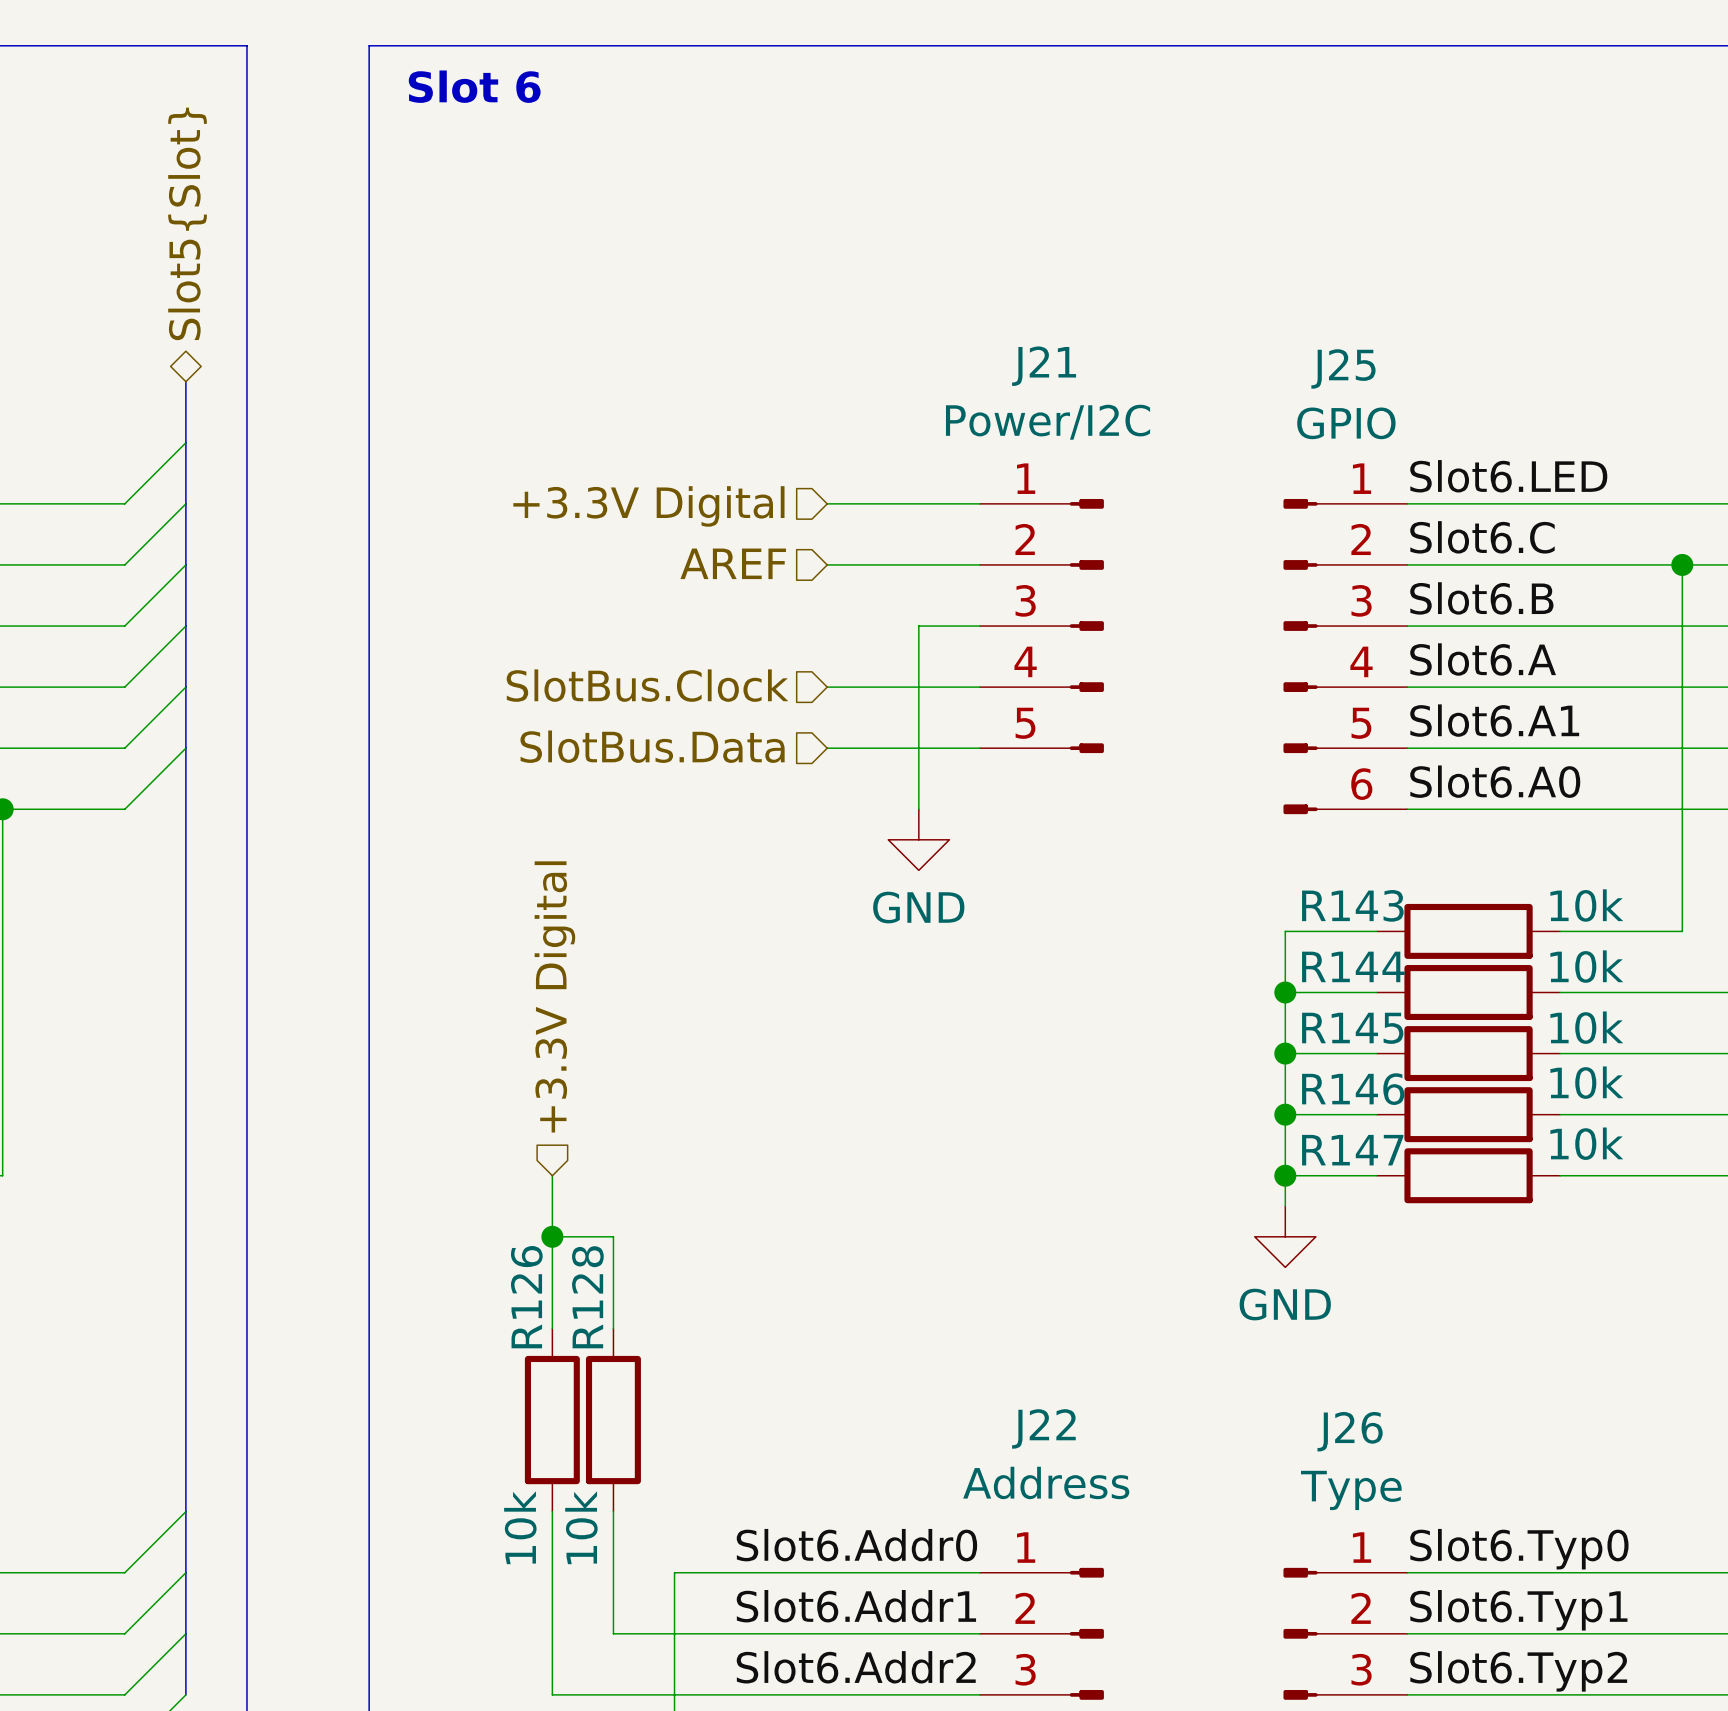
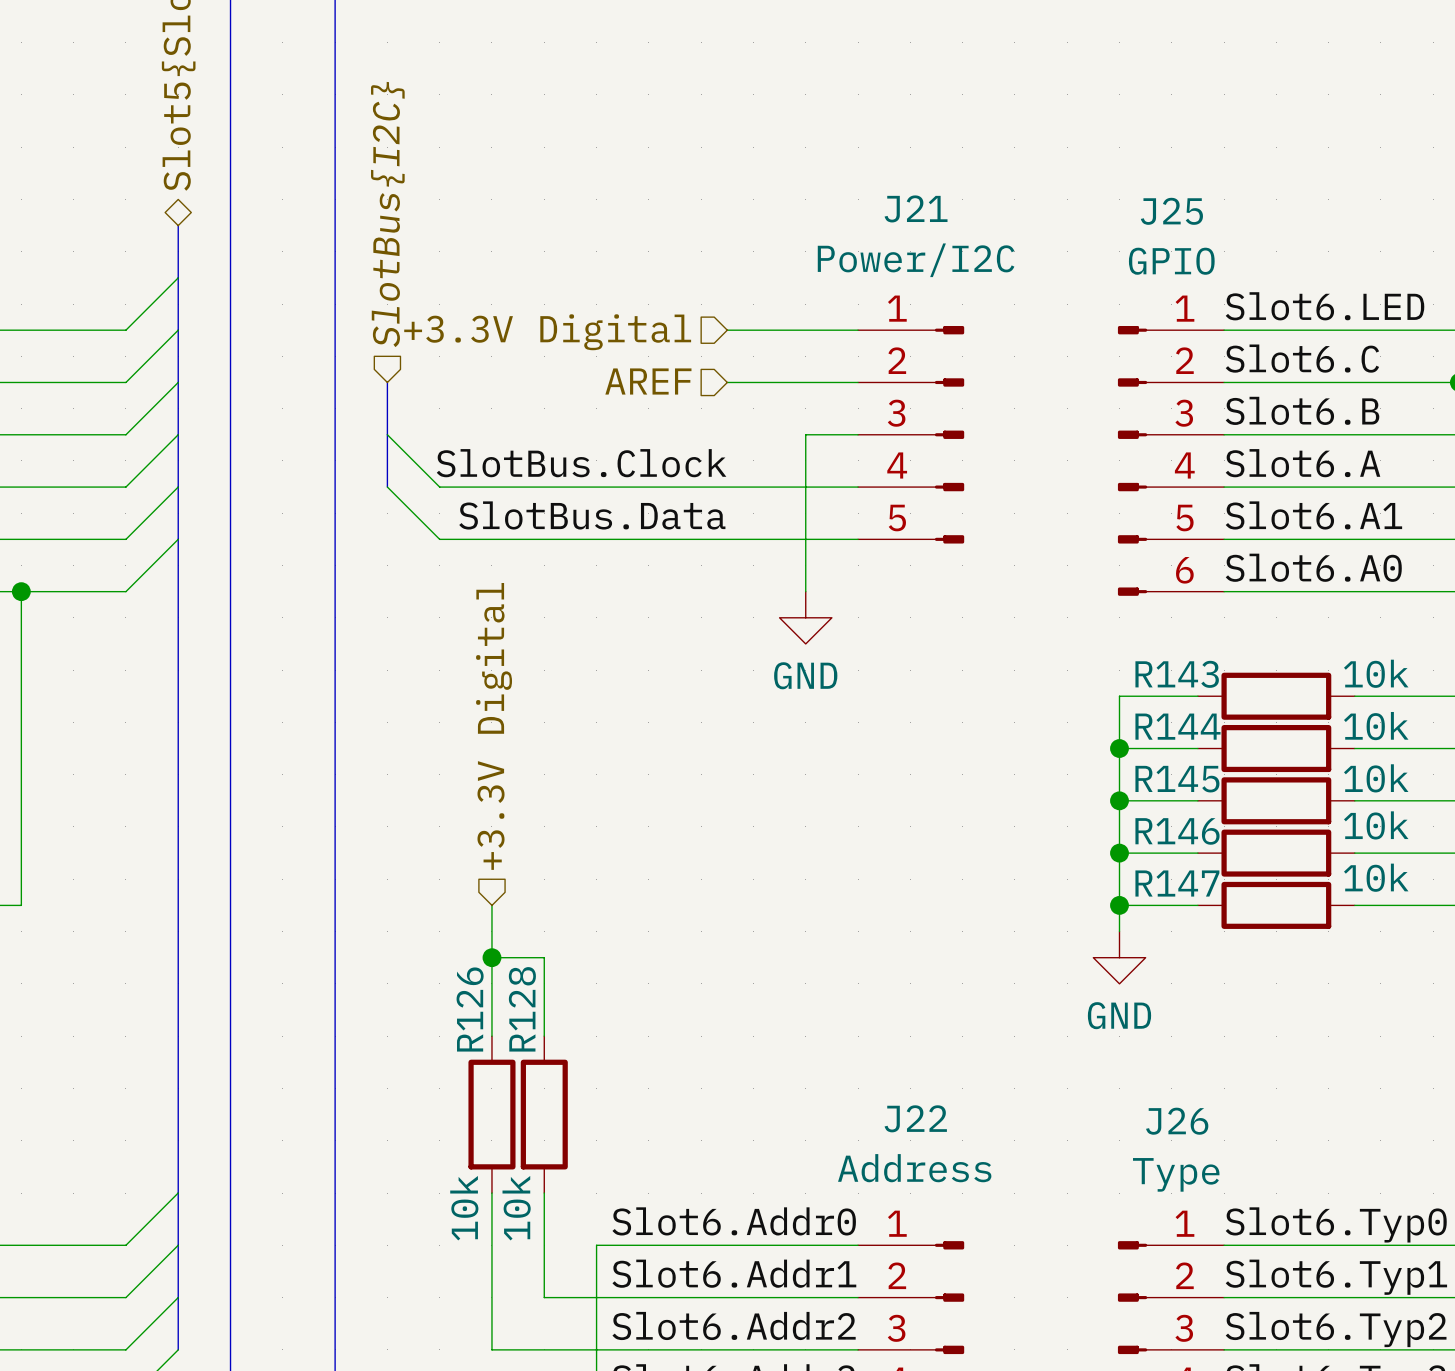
hierarchical label: none -> SlotBus{I2C} (387, 214)
bus: none -> (387, 382) (387, 487)
wire: none -> (387, 434) (439, 487) (727, 487)
label: none -> SlotBus.Clock (581, 463)
hierarchical label: SlotBus.Clock (647, 685) -> none
wire: none -> (387, 487) (439, 539) (727, 539)
label: none -> SlotBus.Data (592, 515)
hierarchical label: SlotBus.Data (652, 746) -> none

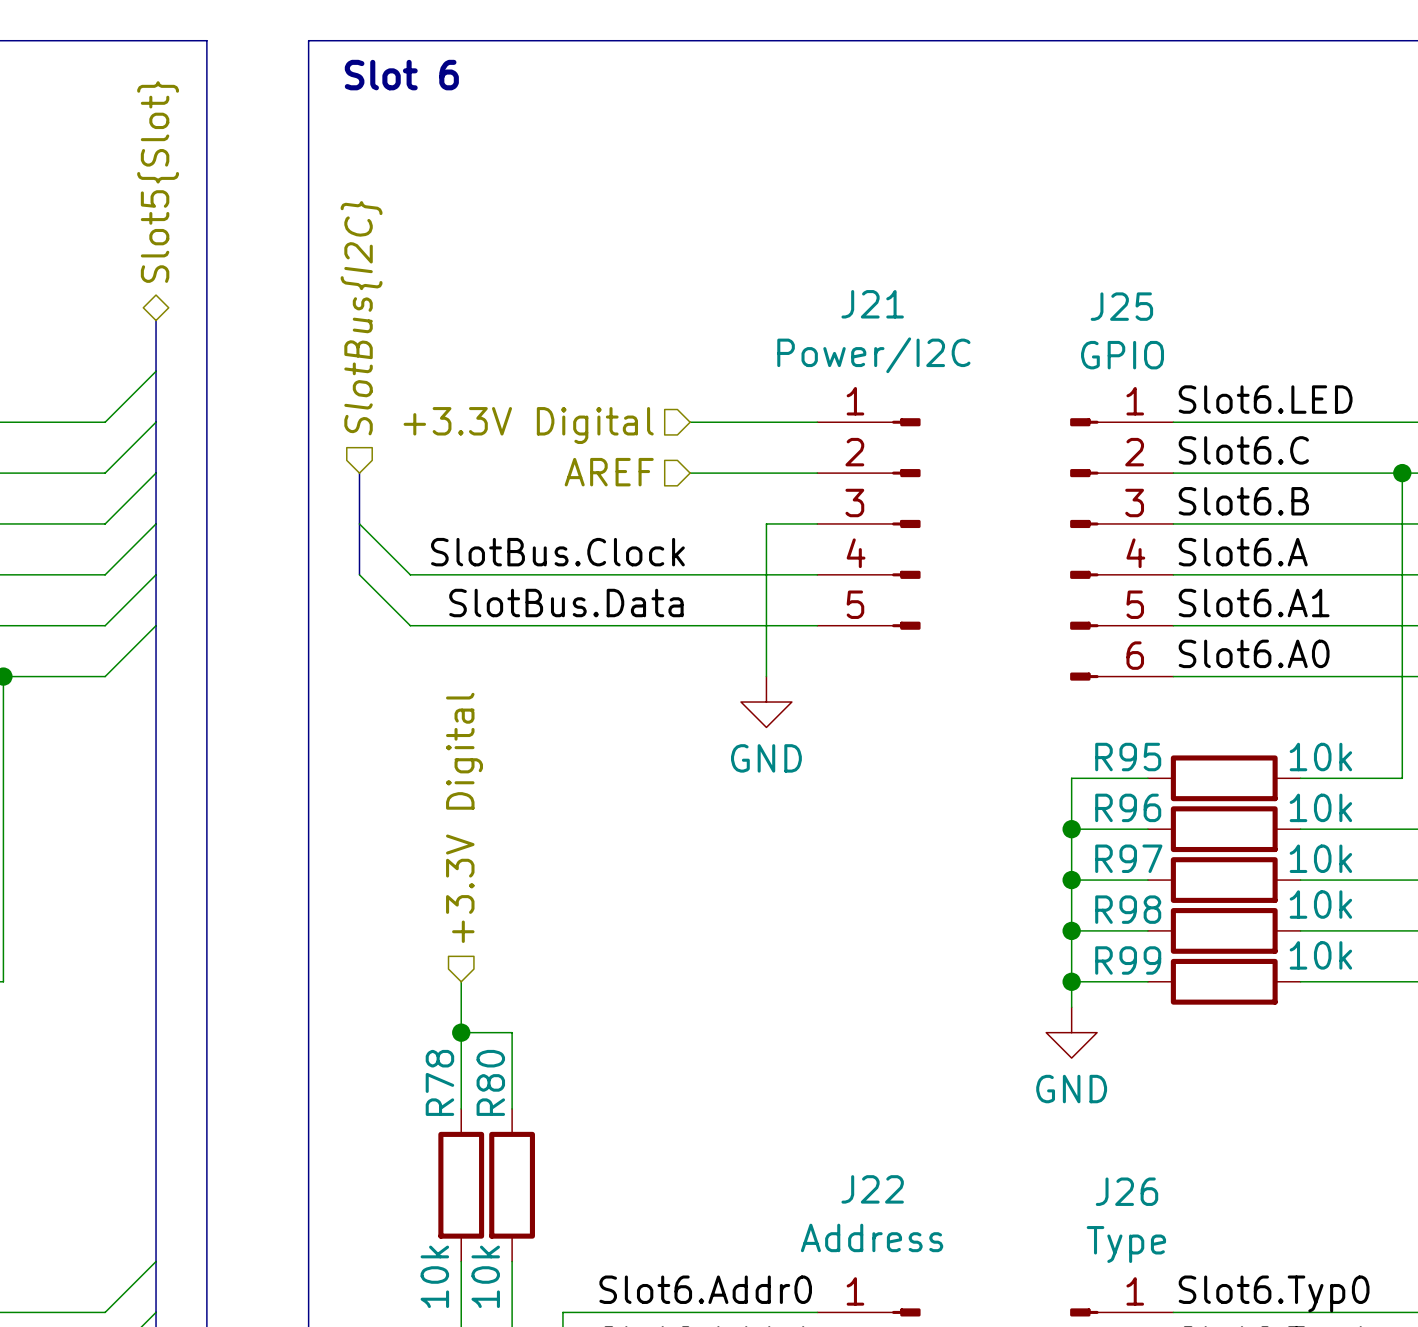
R143 name: R143 (1177, 674) -> R95 (1128, 757)
R144 name: R144 (1177, 726) -> R96 (1128, 807)
R145 name: R145 (1177, 779) -> R97 (1128, 858)
R146 name: R146 (1177, 831) -> R98 (1128, 909)
R147 name: R147 (1177, 883) -> R99 (1128, 960)
R126 name: R126 (470, 1009) -> R78 (439, 1082)
R128 name: R128 (522, 1009) -> R80 (490, 1082)

